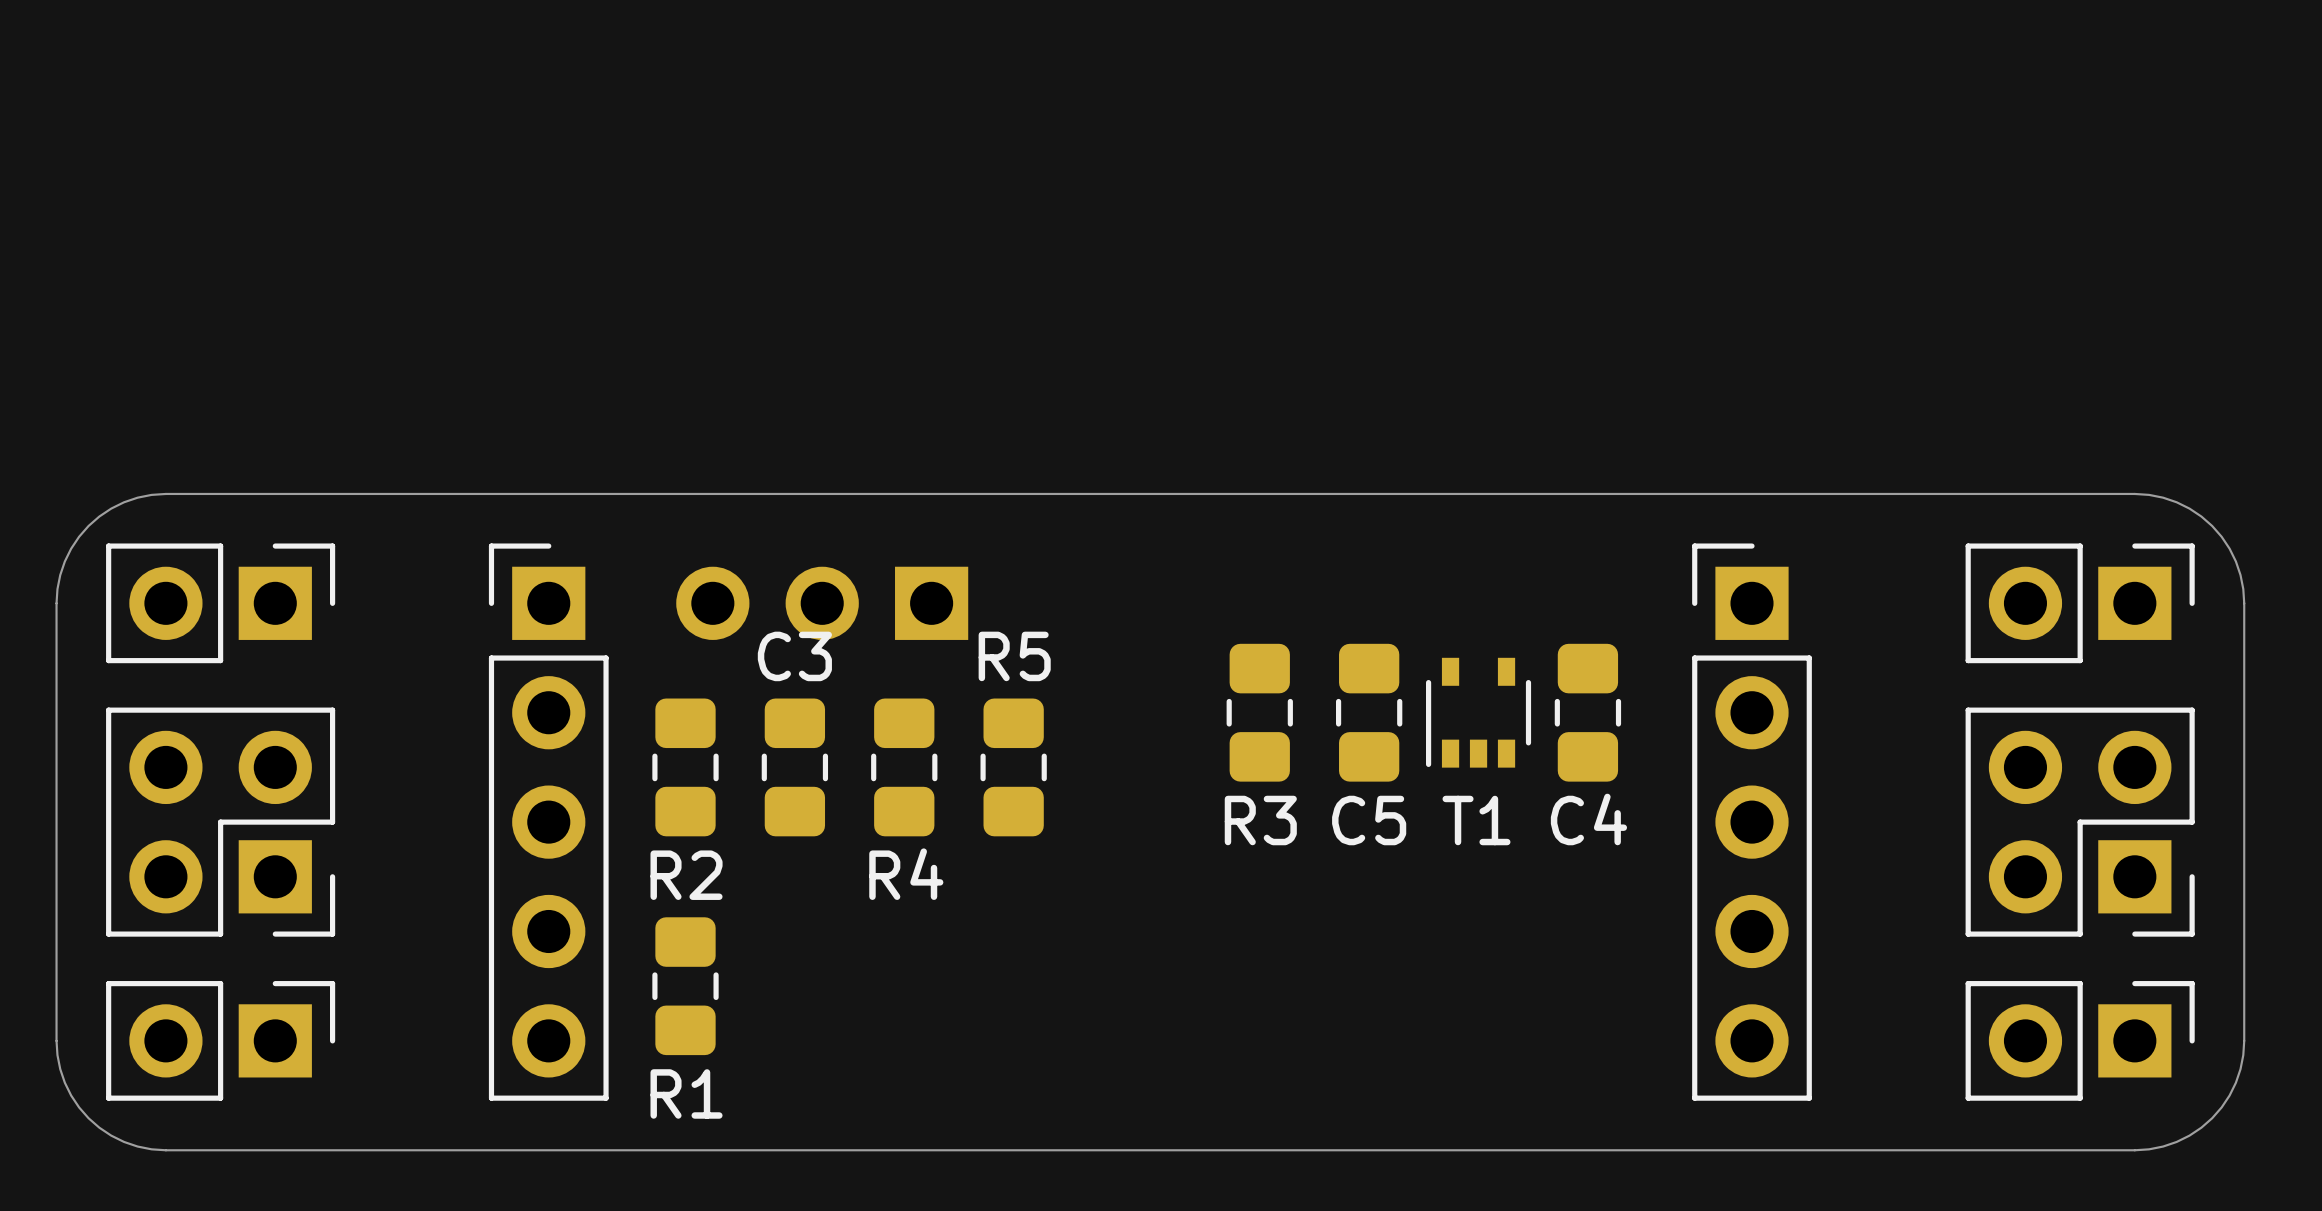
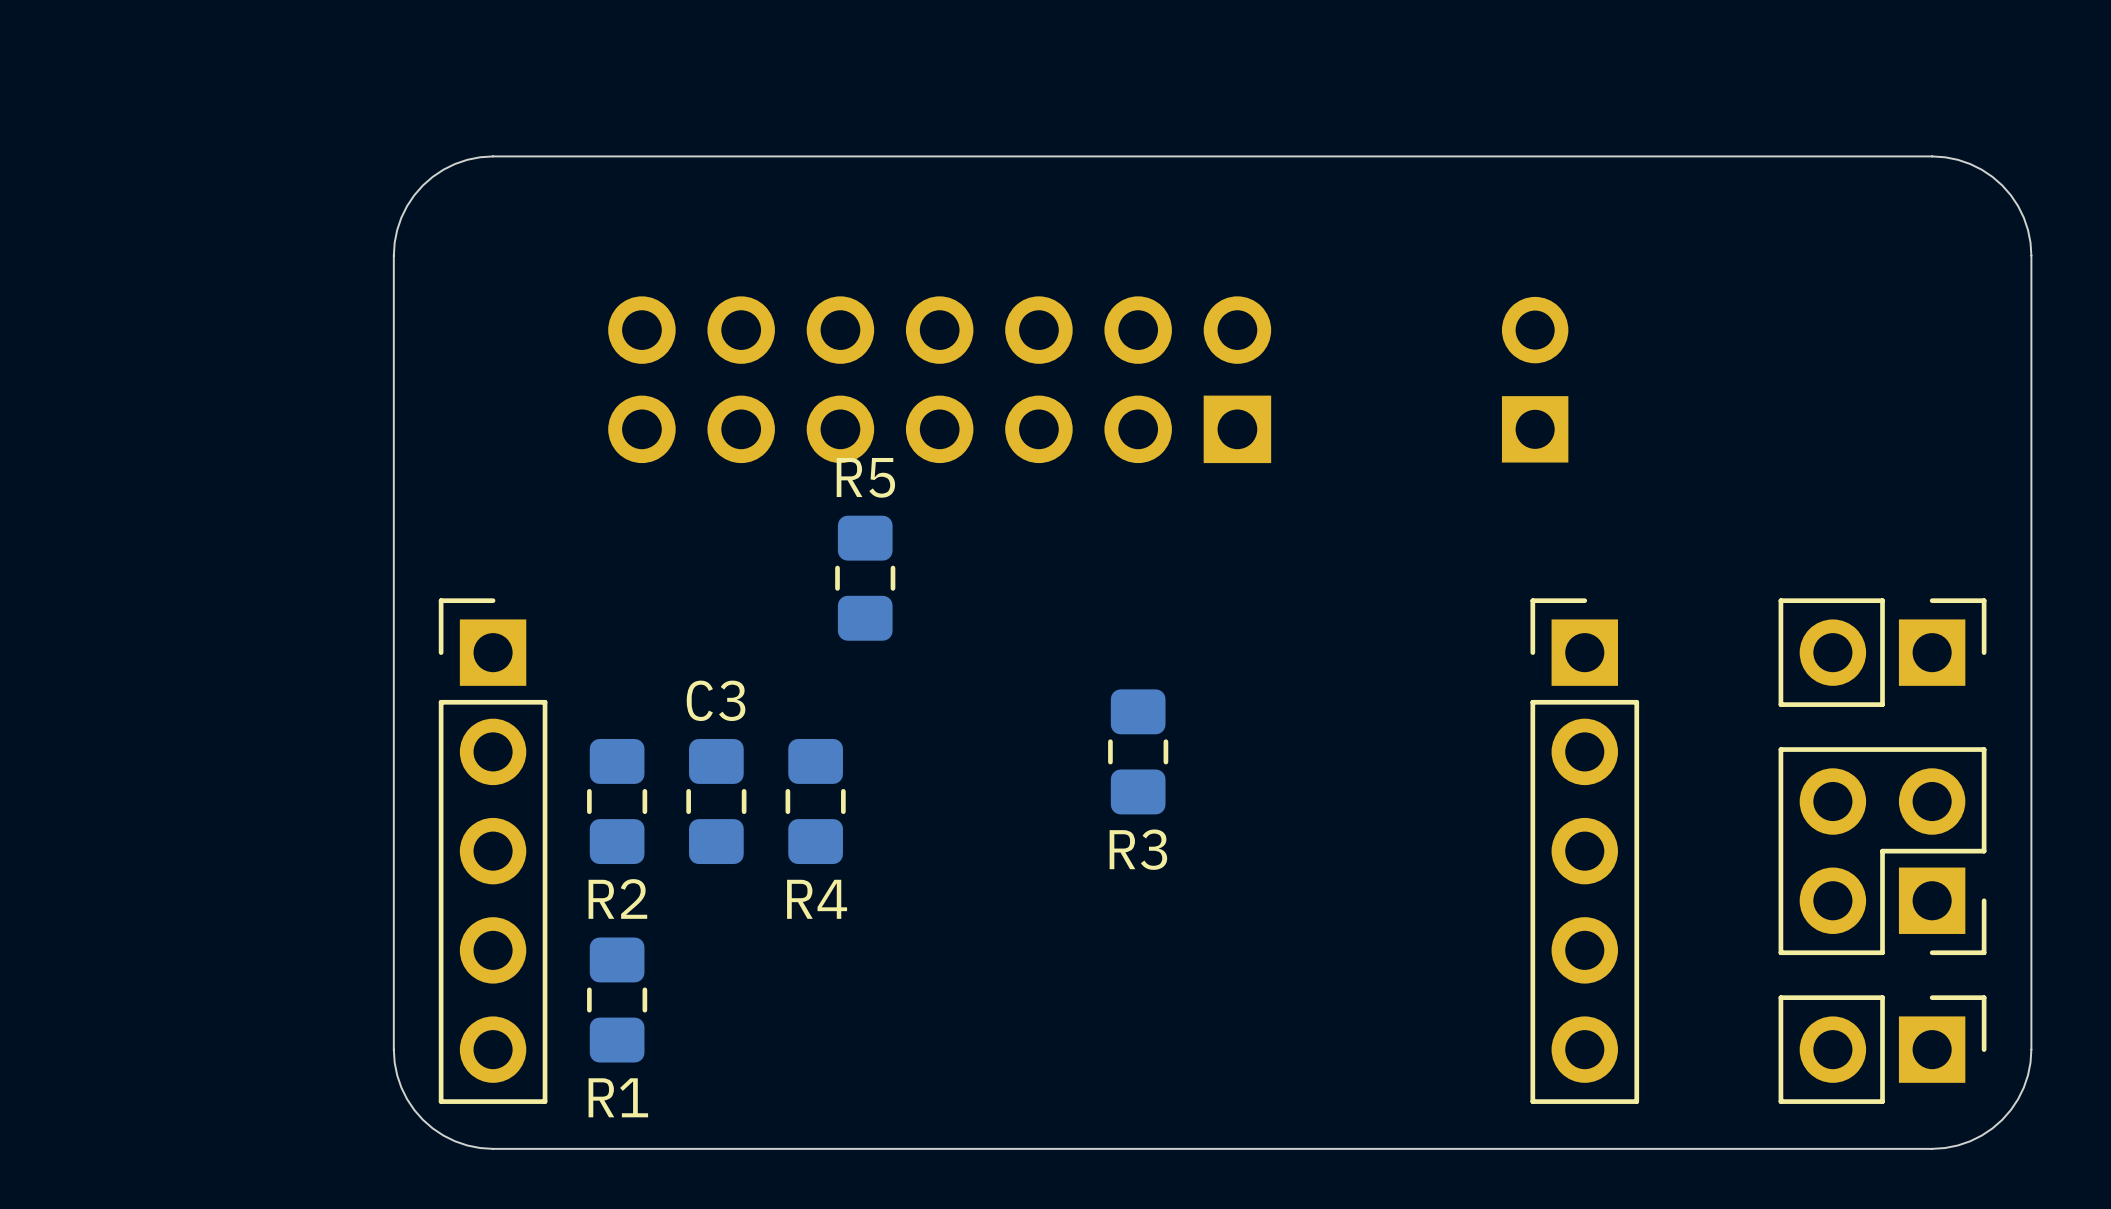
part: none -> (939, 379)
part: none -> (1535, 379)
part: (220, 603) -> none
part: (822, 603) -> none
board edge: (2244, 603) (2240, 575) (2235, 561) (2229, 548) (2212, 525) (2201, 516) (2176, 502) (2163, 497) (2134, 493) (165, 493) (137, 497) (124, 502) (99, 516) (88, 525) (71, 548) (60, 575) (56, 603) (56, 1040) (60, 1069) (64, 1082) (79, 1107) (88, 1118) (111, 1135) (137, 1146) (151, 1149) (548, 1150) -> (2031, 652) (2030, 242) (2028, 229) (2018, 206) (2002, 185) (1981, 169) (1957, 159) (1932, 156) (493, 156) (467, 159) (443, 169) (422, 185) (414, 195) (401, 217) (394, 242) (393, 1049) (397, 1075) (401, 1087) (414, 1110) (422, 1119) (443, 1135) (455, 1141) (467, 1145) (493, 1148)
C5: (1369, 712) -> none
T1: (1478, 712) -> none
C4: (1587, 712) -> none
R5 position: (1013, 767) -> (865, 578)
part: (220, 822) -> none
part: (220, 1040) -> none

